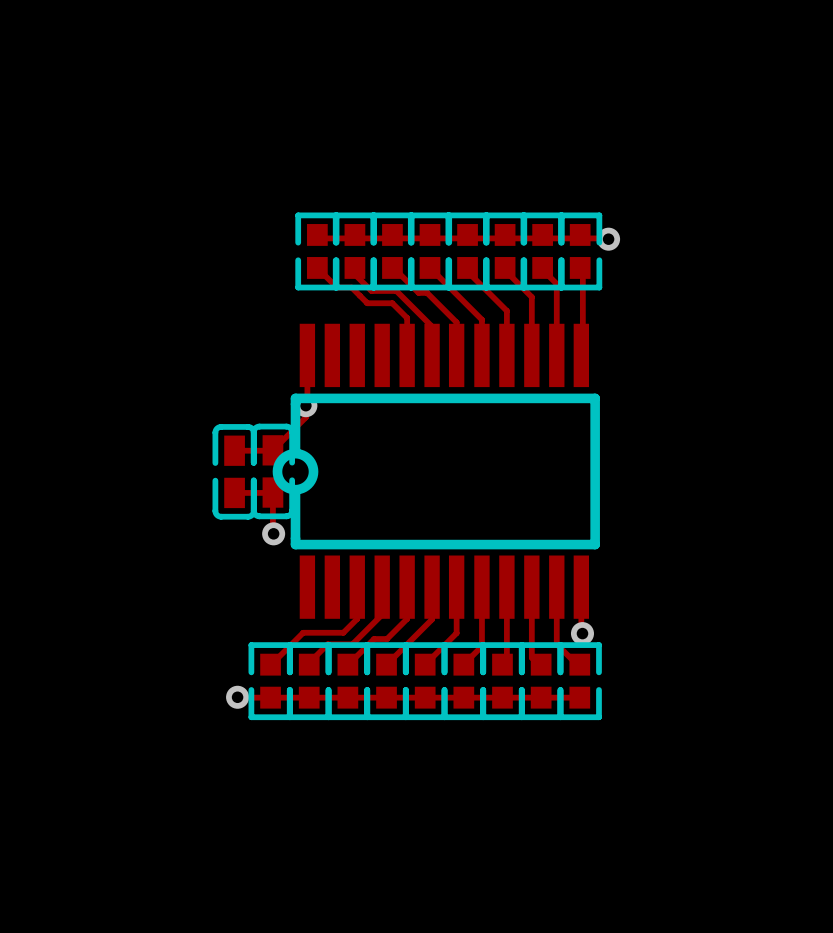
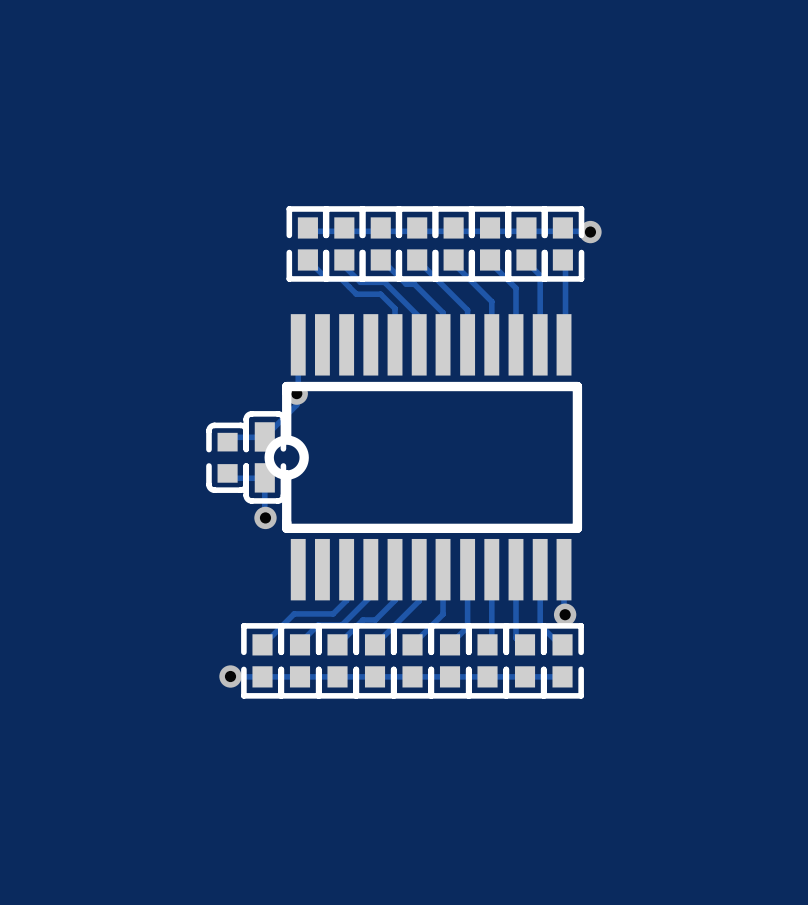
part footprint: [212, 424, 257, 520] -> [206, 422, 249, 493]

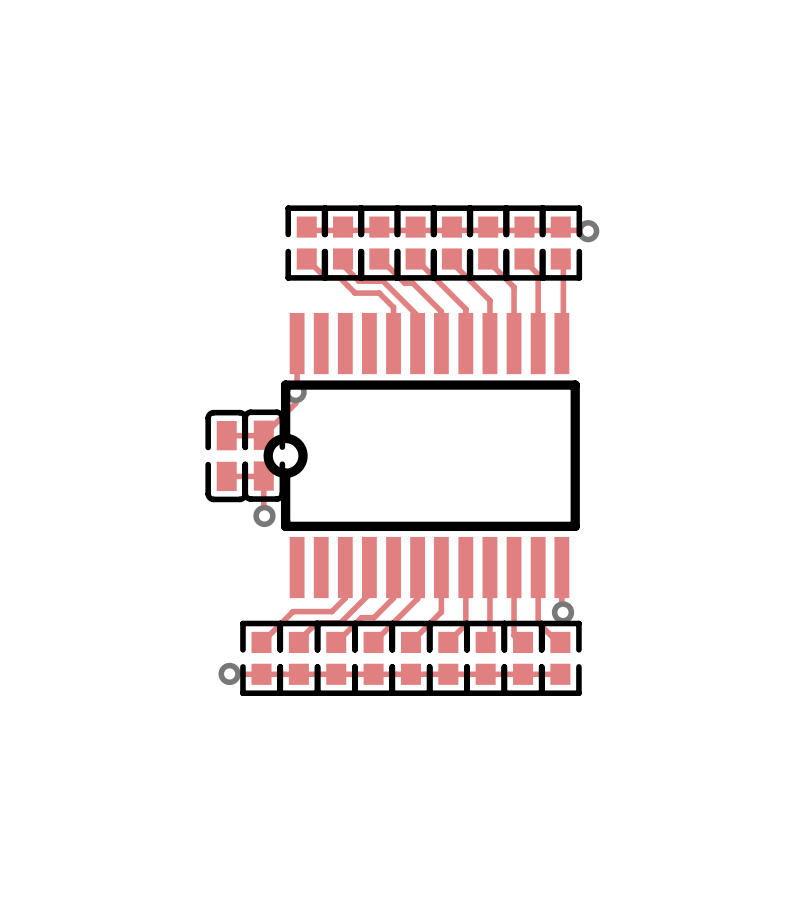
part footprint: [206, 422, 249, 493] -> [205, 409, 249, 503]

